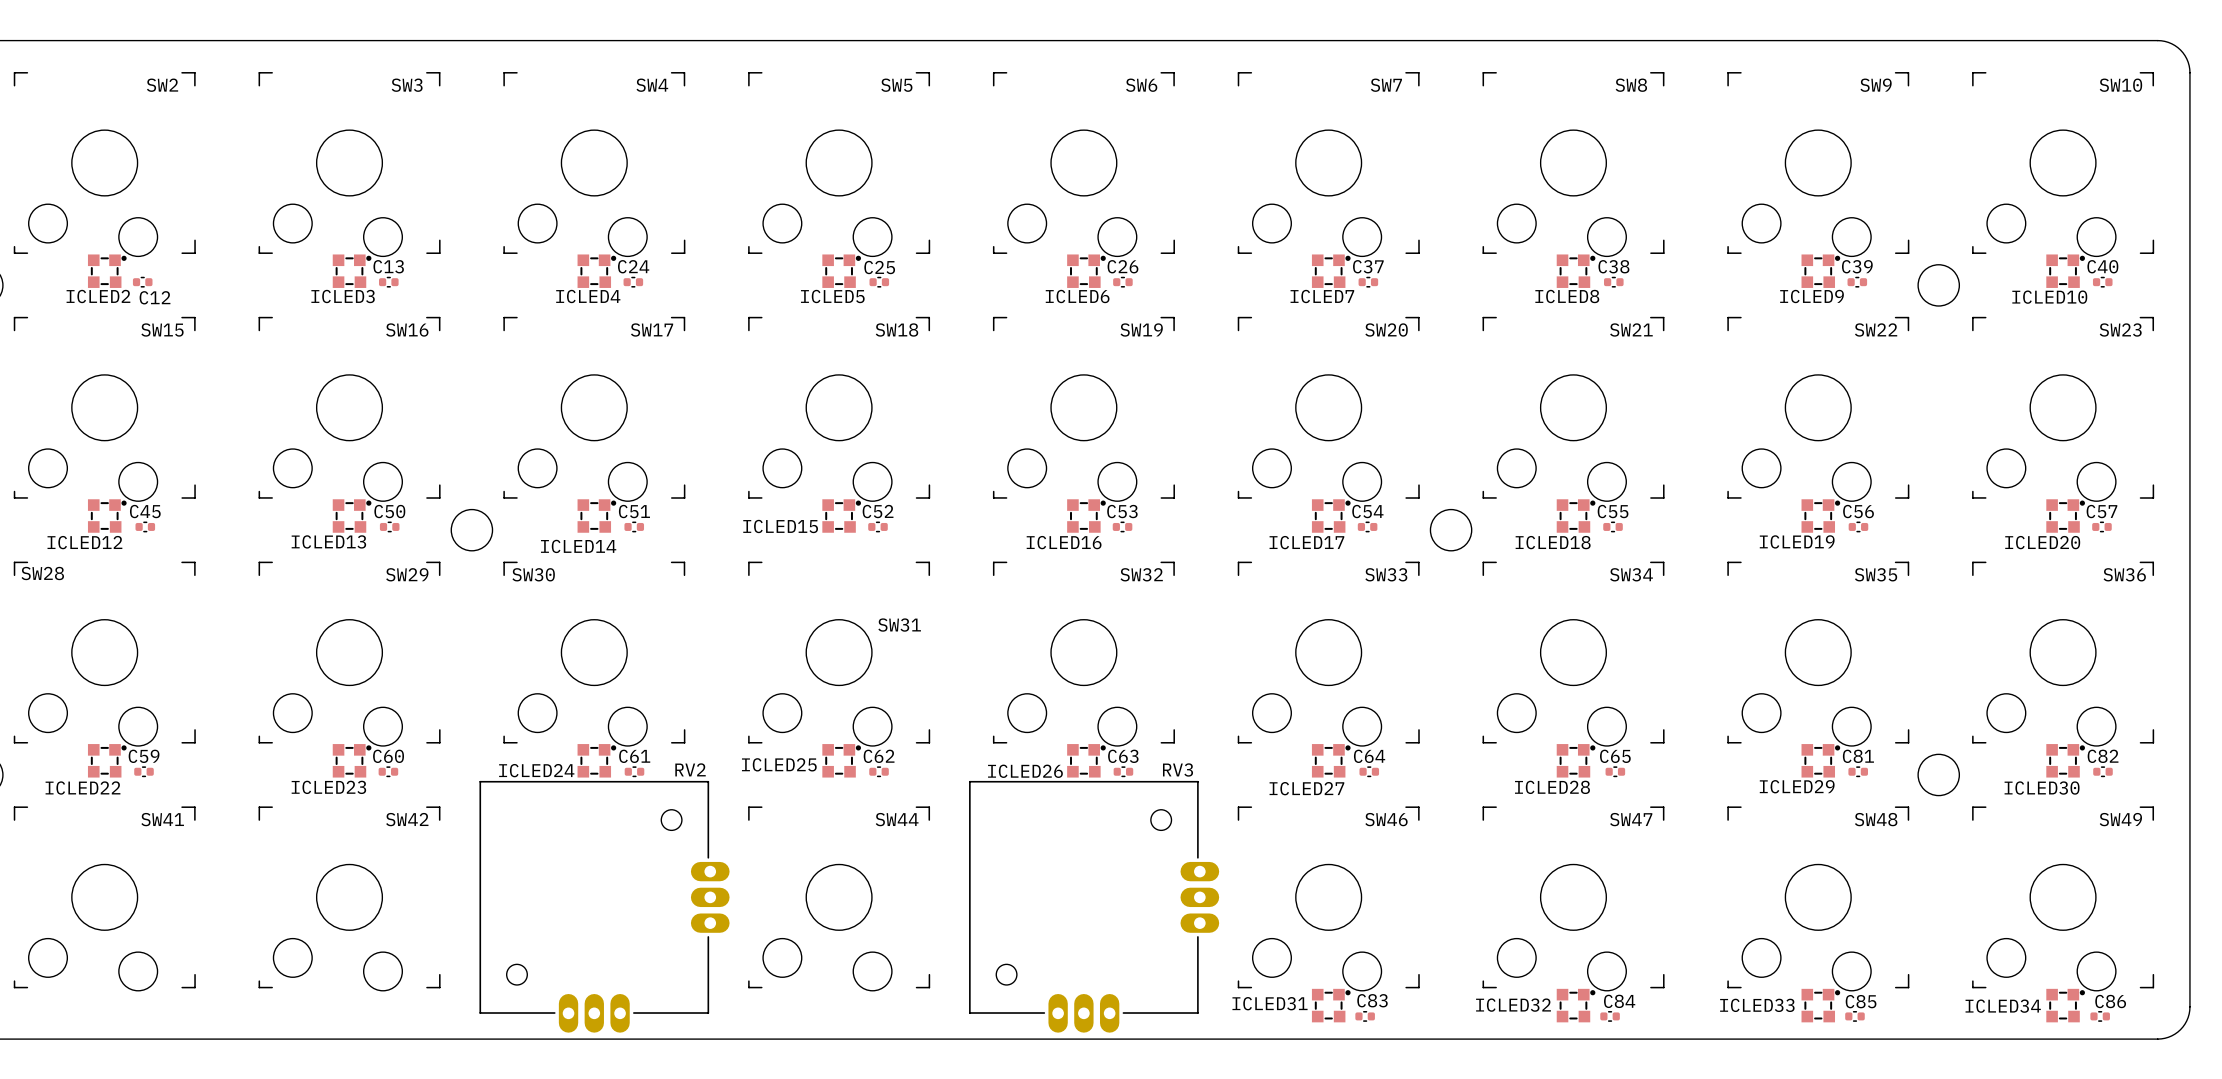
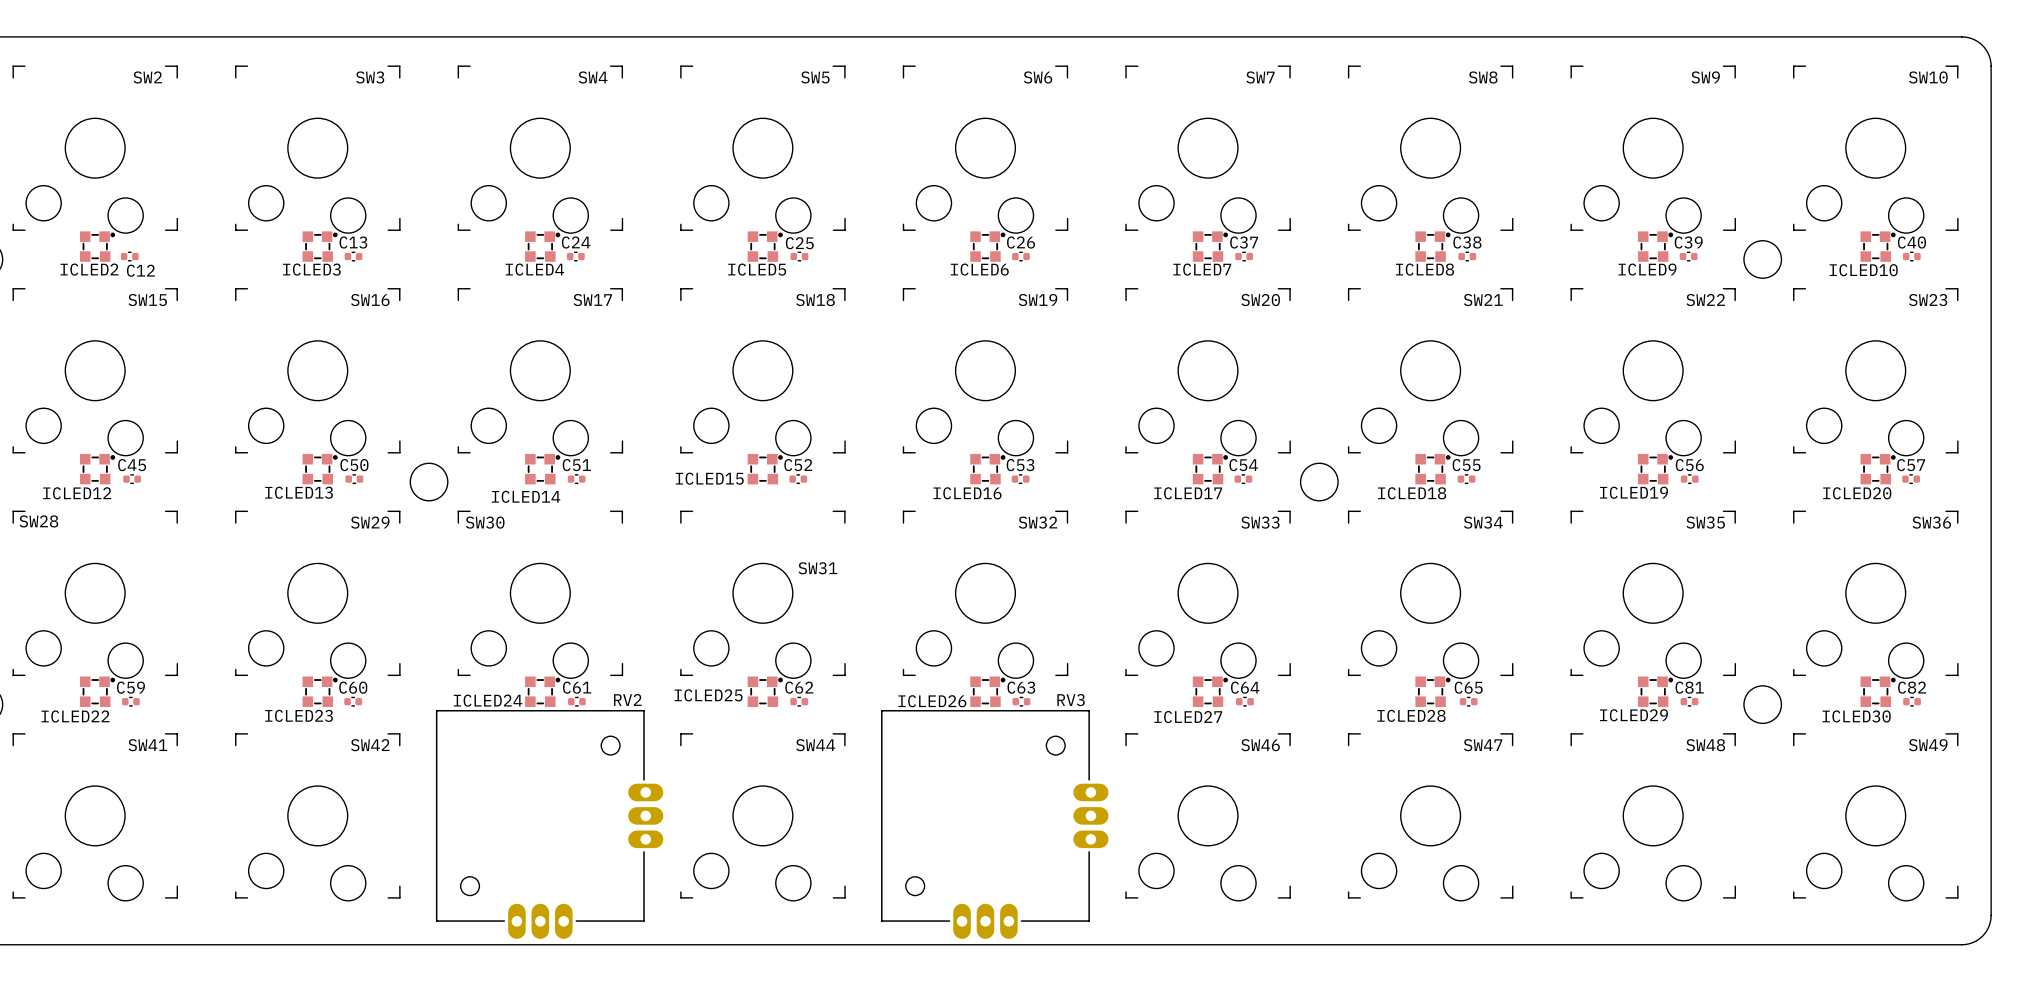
ICLED31: (1331, 1005) -> none
ICLED32: (1576, 1005) -> none
ICLED33: (1820, 1005) -> none
ICLED34: (2065, 1005) -> none
C83: (1365, 1016) -> none
C84: (1610, 1016) -> none
C85: (1854, 1016) -> none
C86: (2100, 1016) -> none

